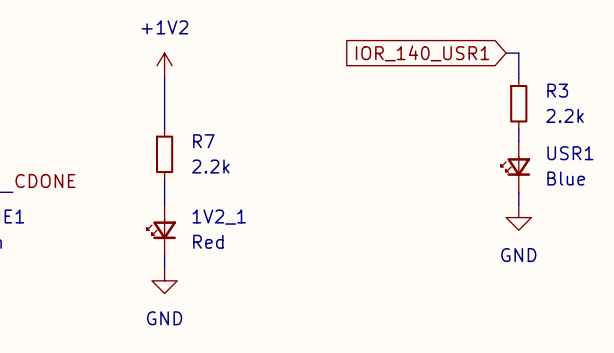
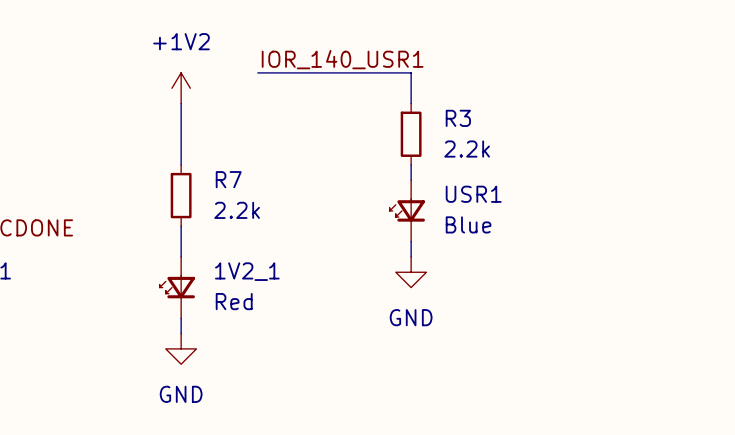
label: none -> IOR_140_USR1 (342, 59)
wire: none -> (257, 72) (411, 72) (411, 103)
global label: IOR_140_USR1 (422, 53) -> none
wire: (506, 53) (518, 53) (518, 78) -> none
R3 position: (518, 103) -> (411, 134)
wire: (518, 129) (518, 141) -> (411, 164) (411, 180)
USR1 position: (515, 166) -> (407, 210)
wire: (518, 192) (518, 204) -> (411, 241) (411, 256)
power symbol position: GND (518, 217) -> GND (411, 272)

